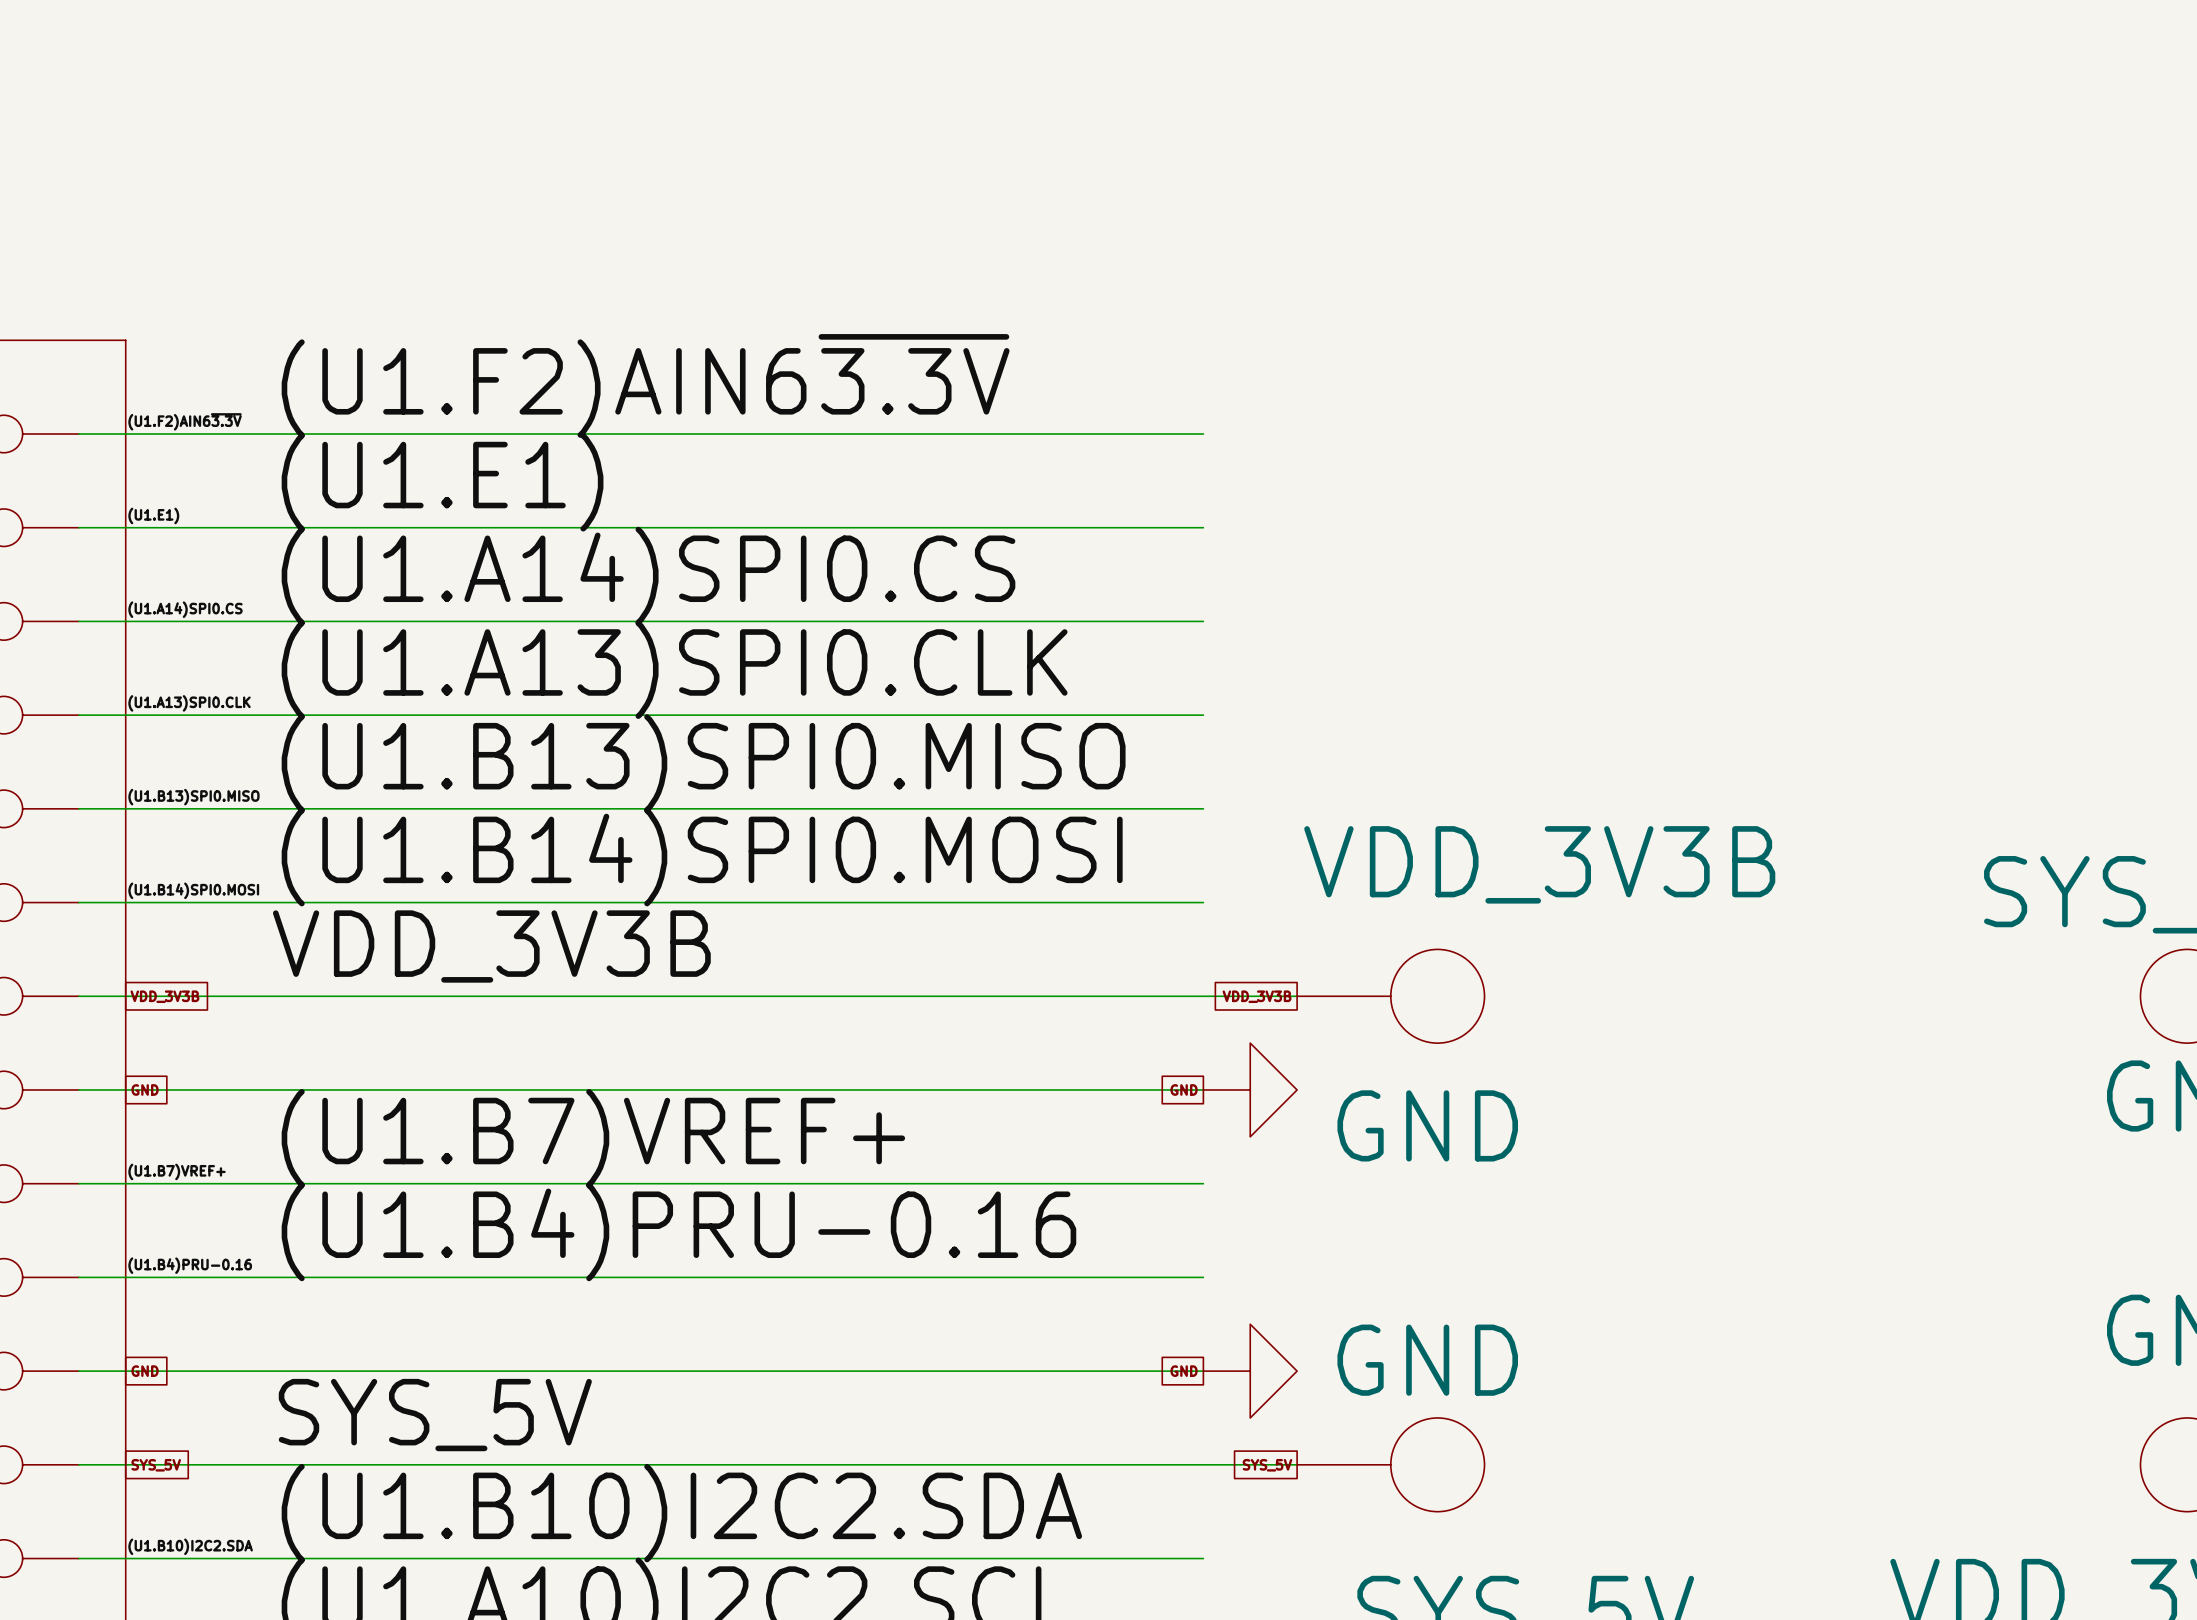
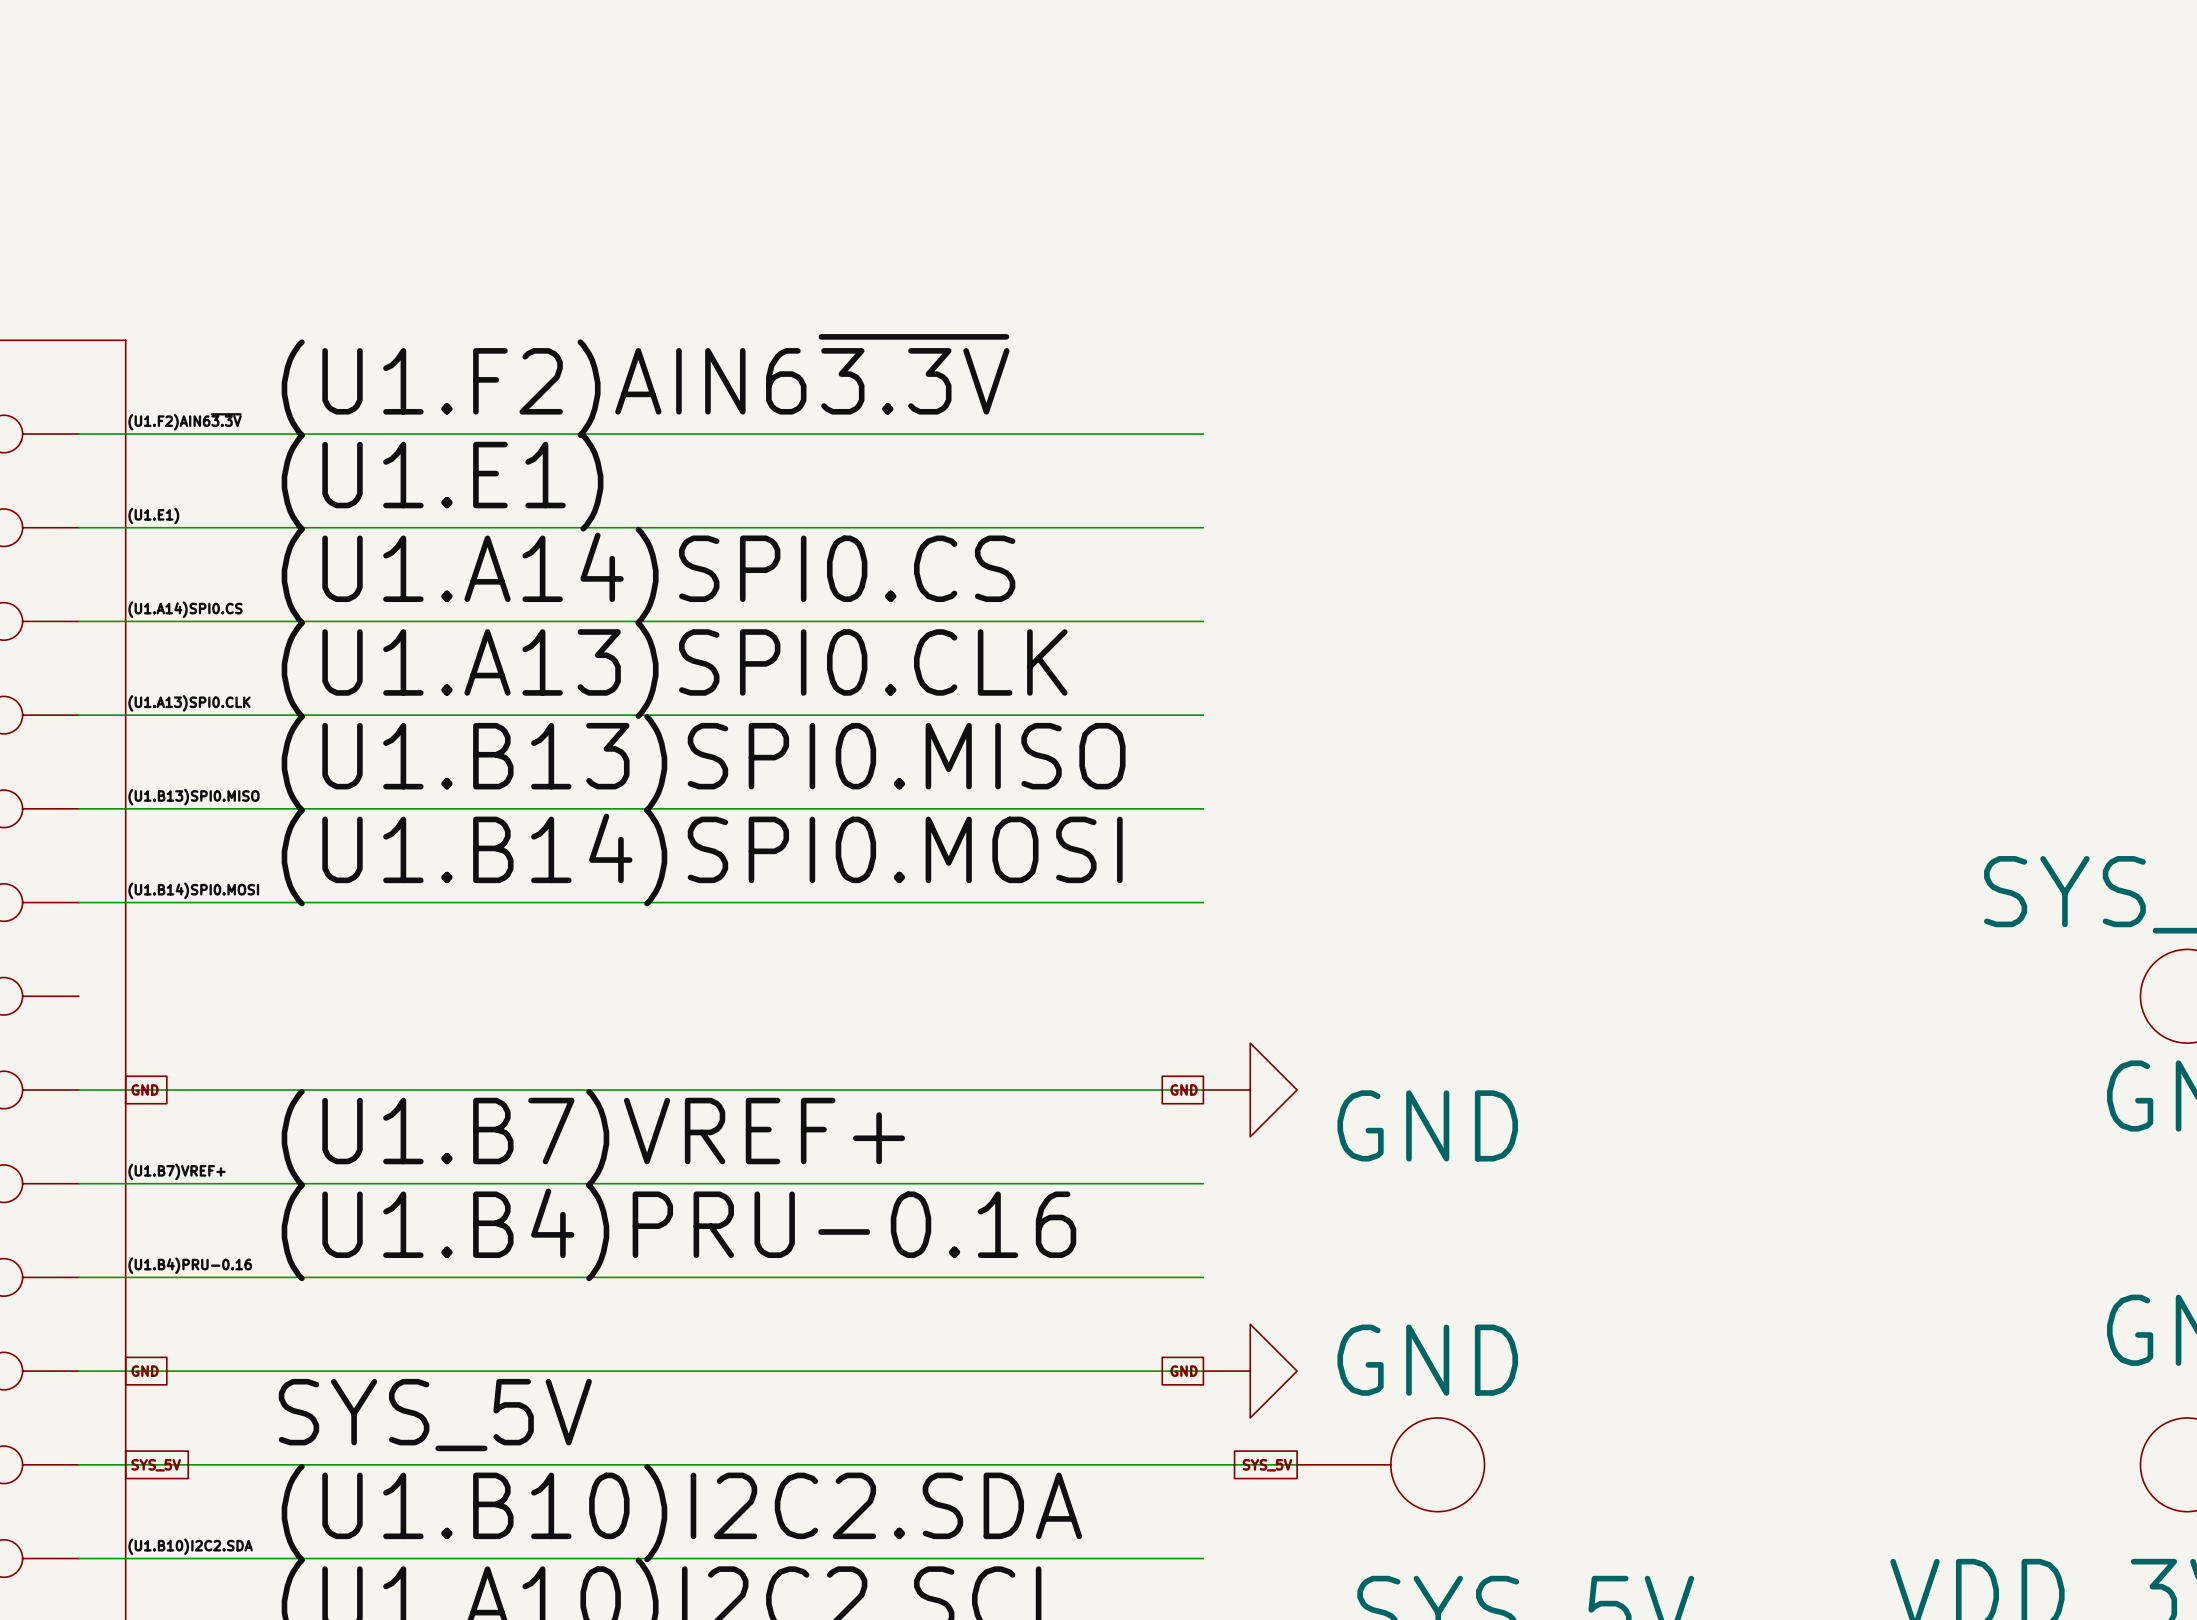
label: VDD_3V3B (491, 946) -> none
wire: (78, 996) (1297, 996) -> none
global label: VDD_3V3B (164, 996) -> none
global label: VDD_3V3B (1257, 996) -> none
power symbol: VDD_3V3B (1390, 996) -> none

